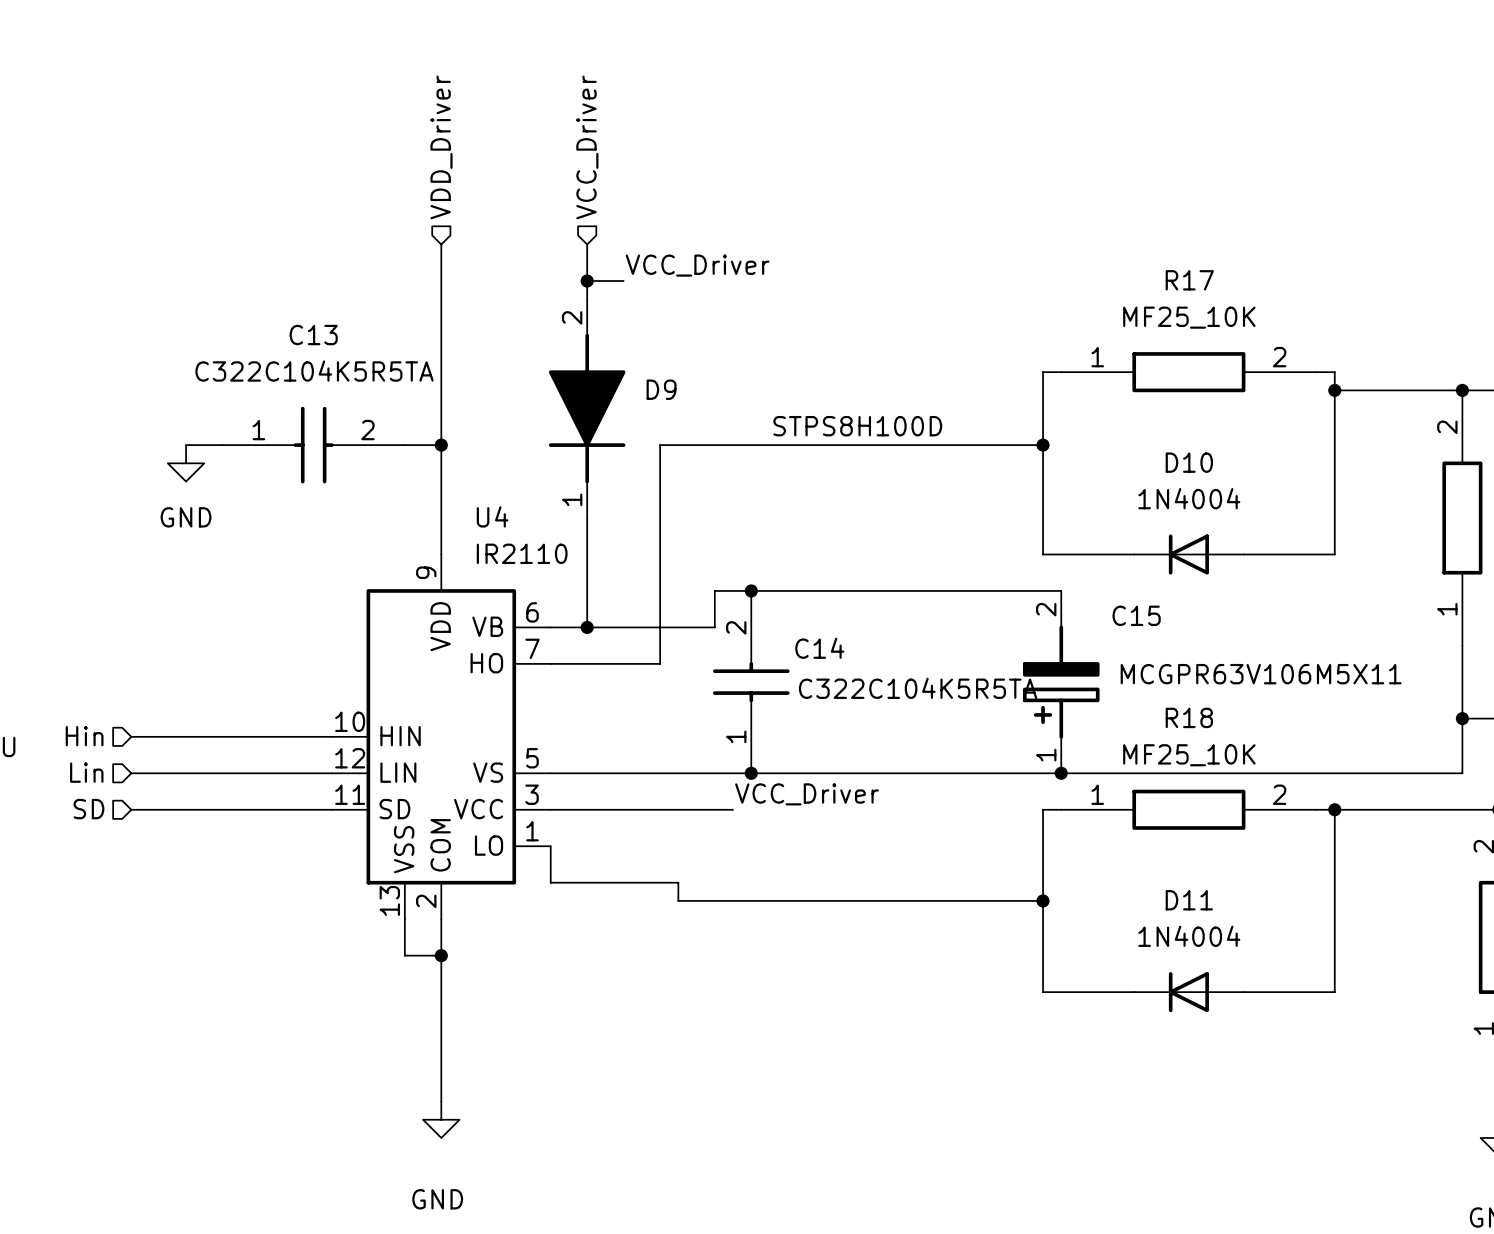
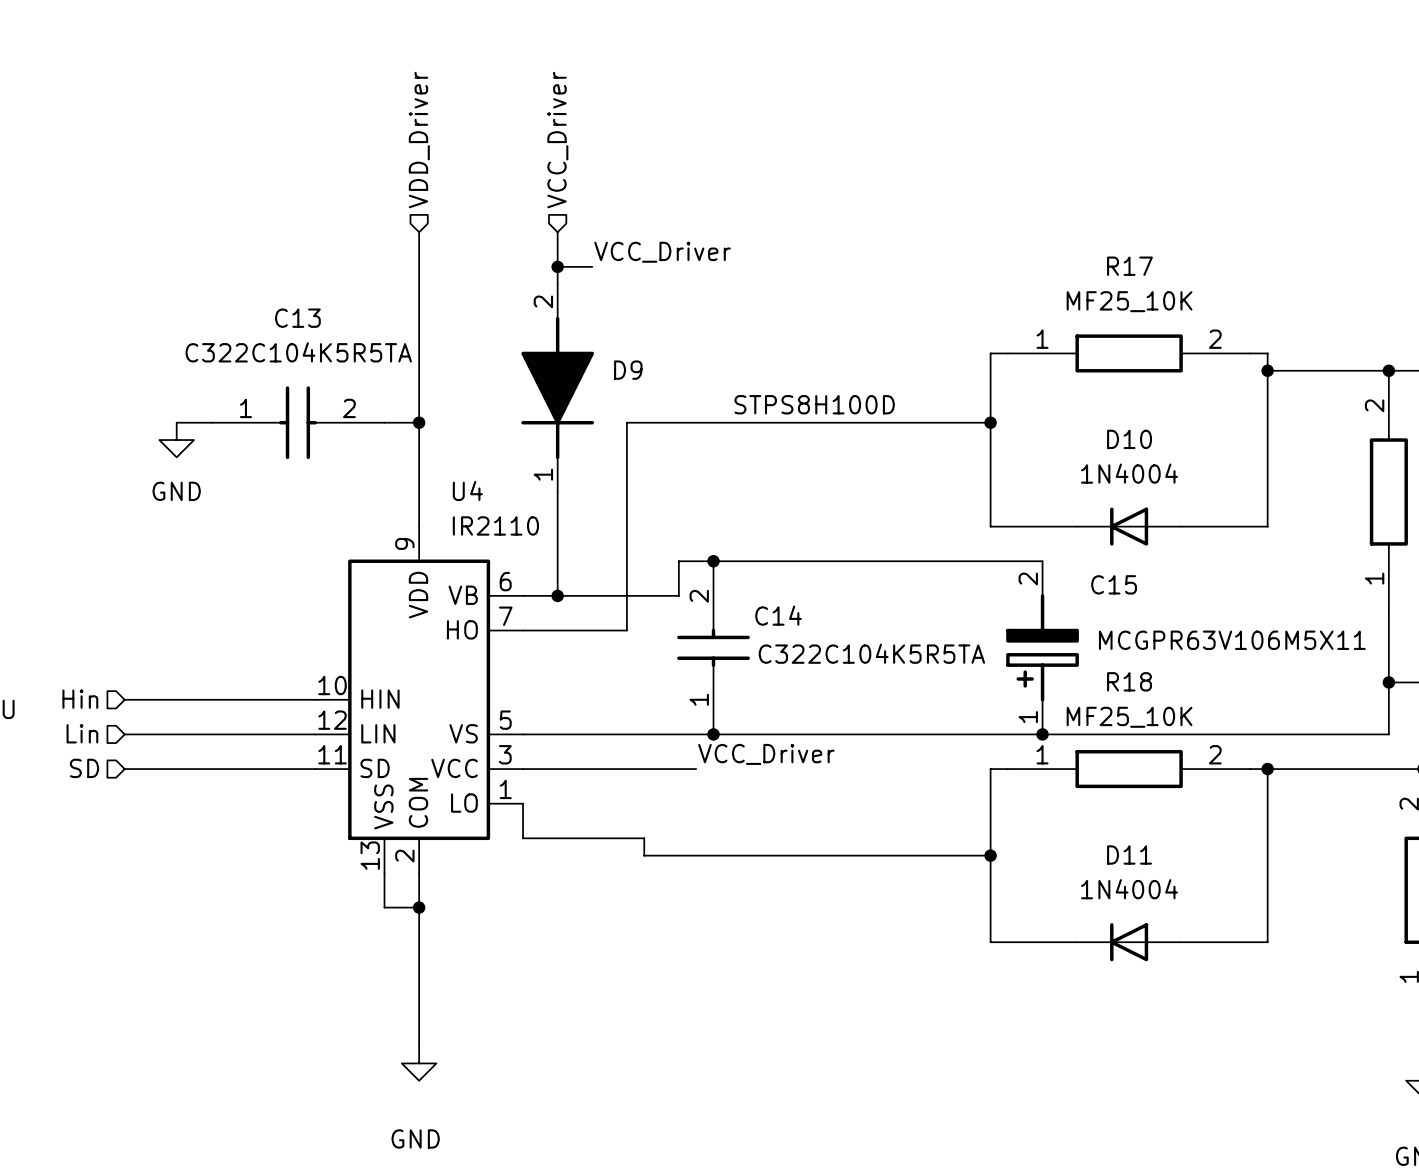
wire: none -> (1007, 561) (1042, 561)
C15 position: (1061, 682) -> (1042, 647)
junction position: (1061, 773) -> (1042, 734)

